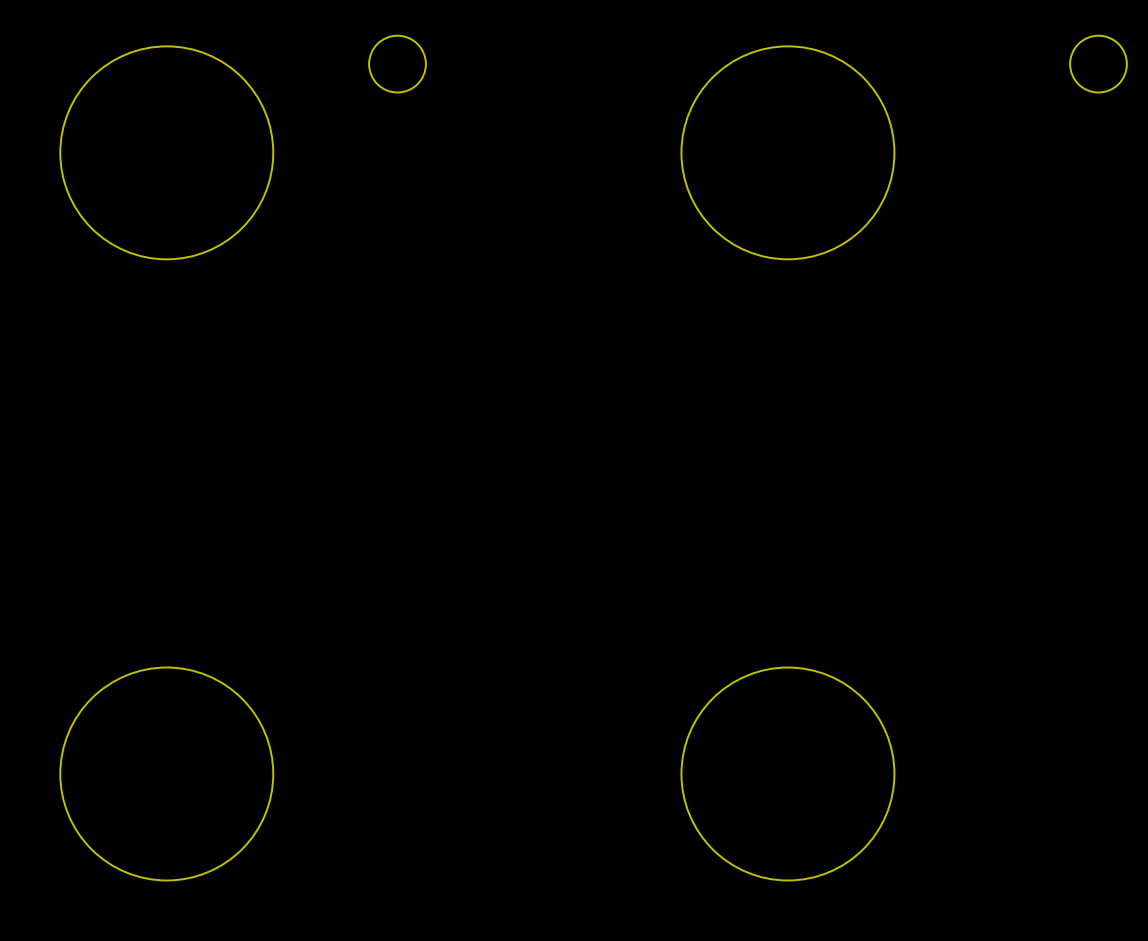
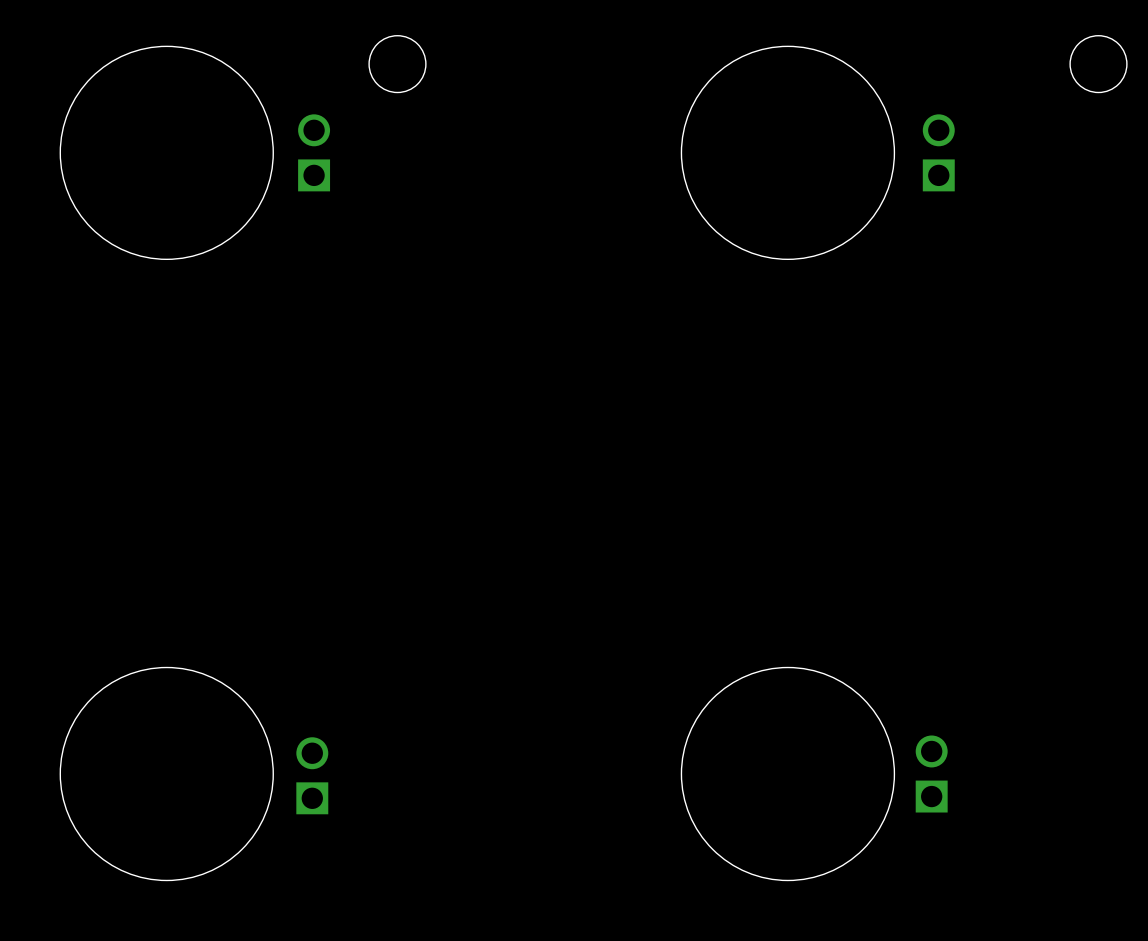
part: none -> (314, 152)
part: none -> (938, 152)
part: none -> (931, 774)
part: none -> (312, 775)

